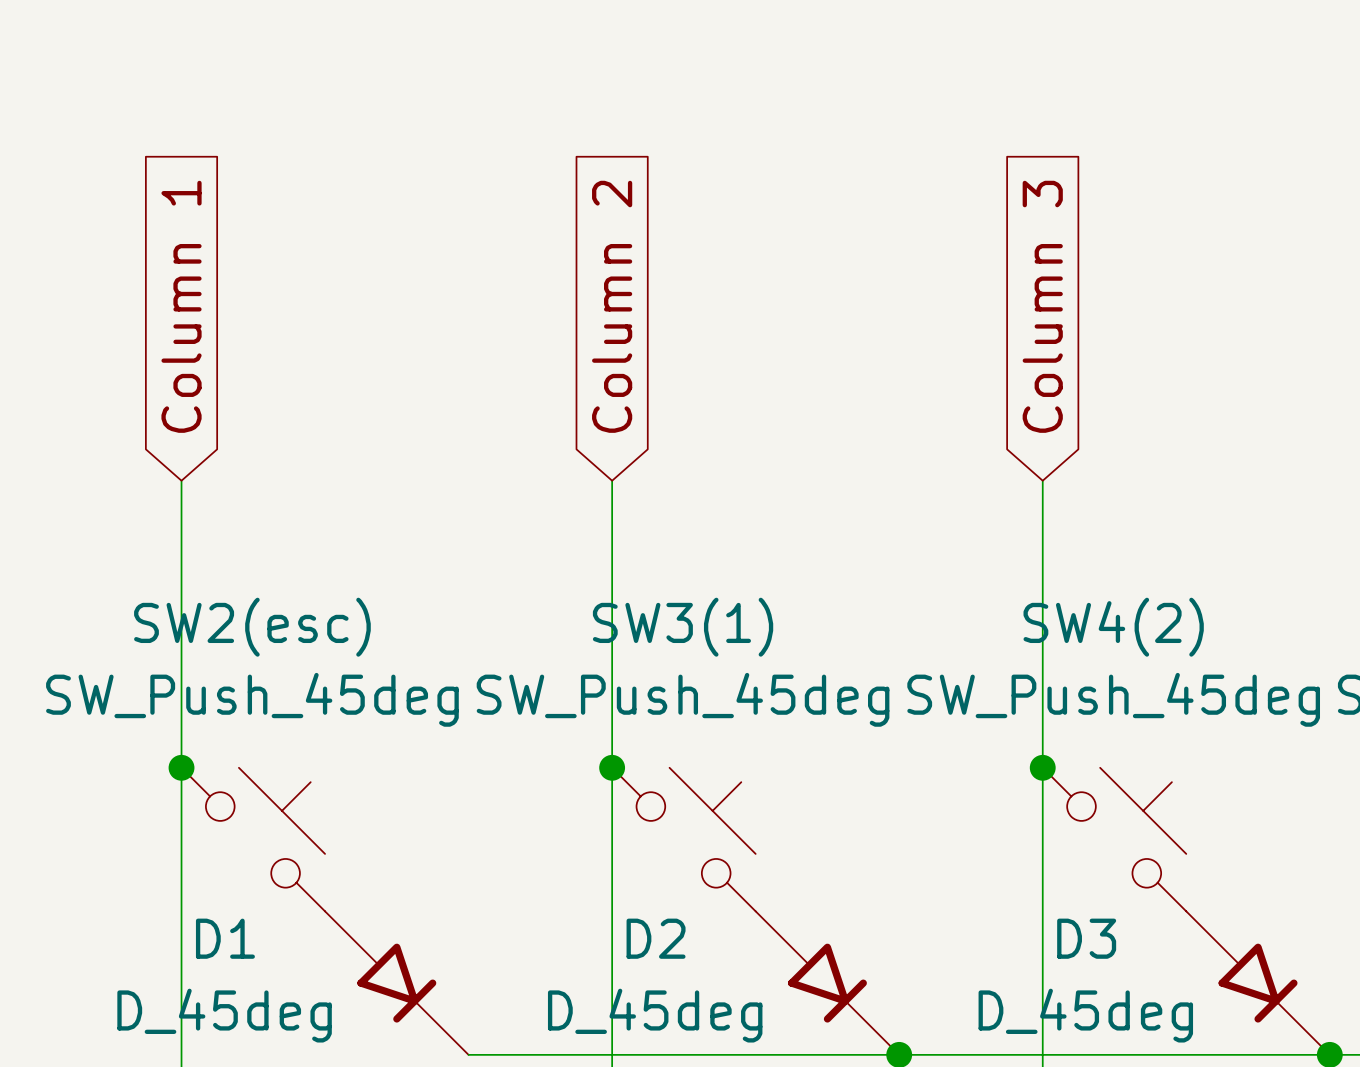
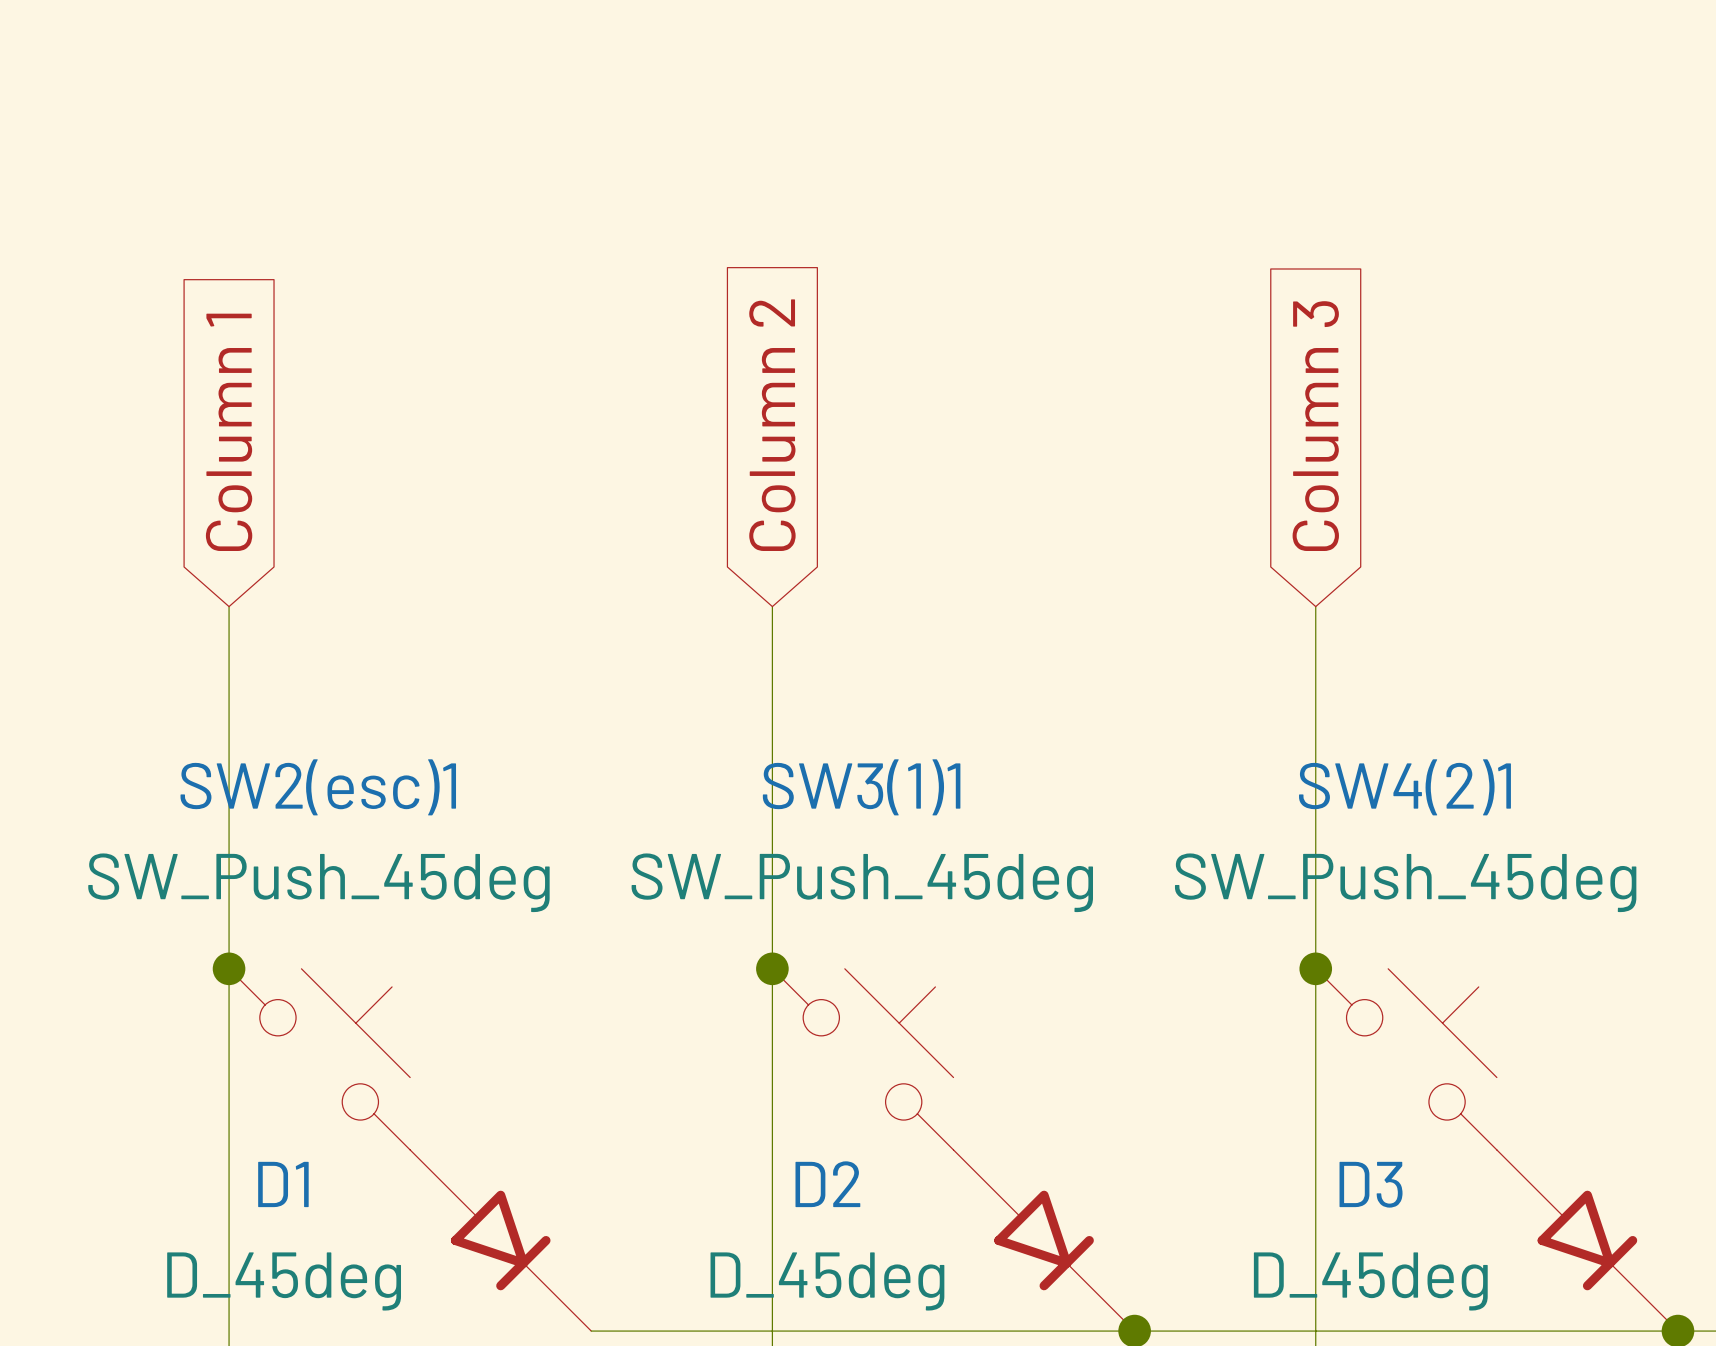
SW2(esc) name: SW2(esc) (252, 627) -> SW2(esc)1 (318, 787)
SW3(1) name: SW3(1) (683, 627) -> SW3(1)1 (861, 787)
SW4(2) name: SW4(2) (1113, 627) -> SW4(2)1 (1404, 787)

